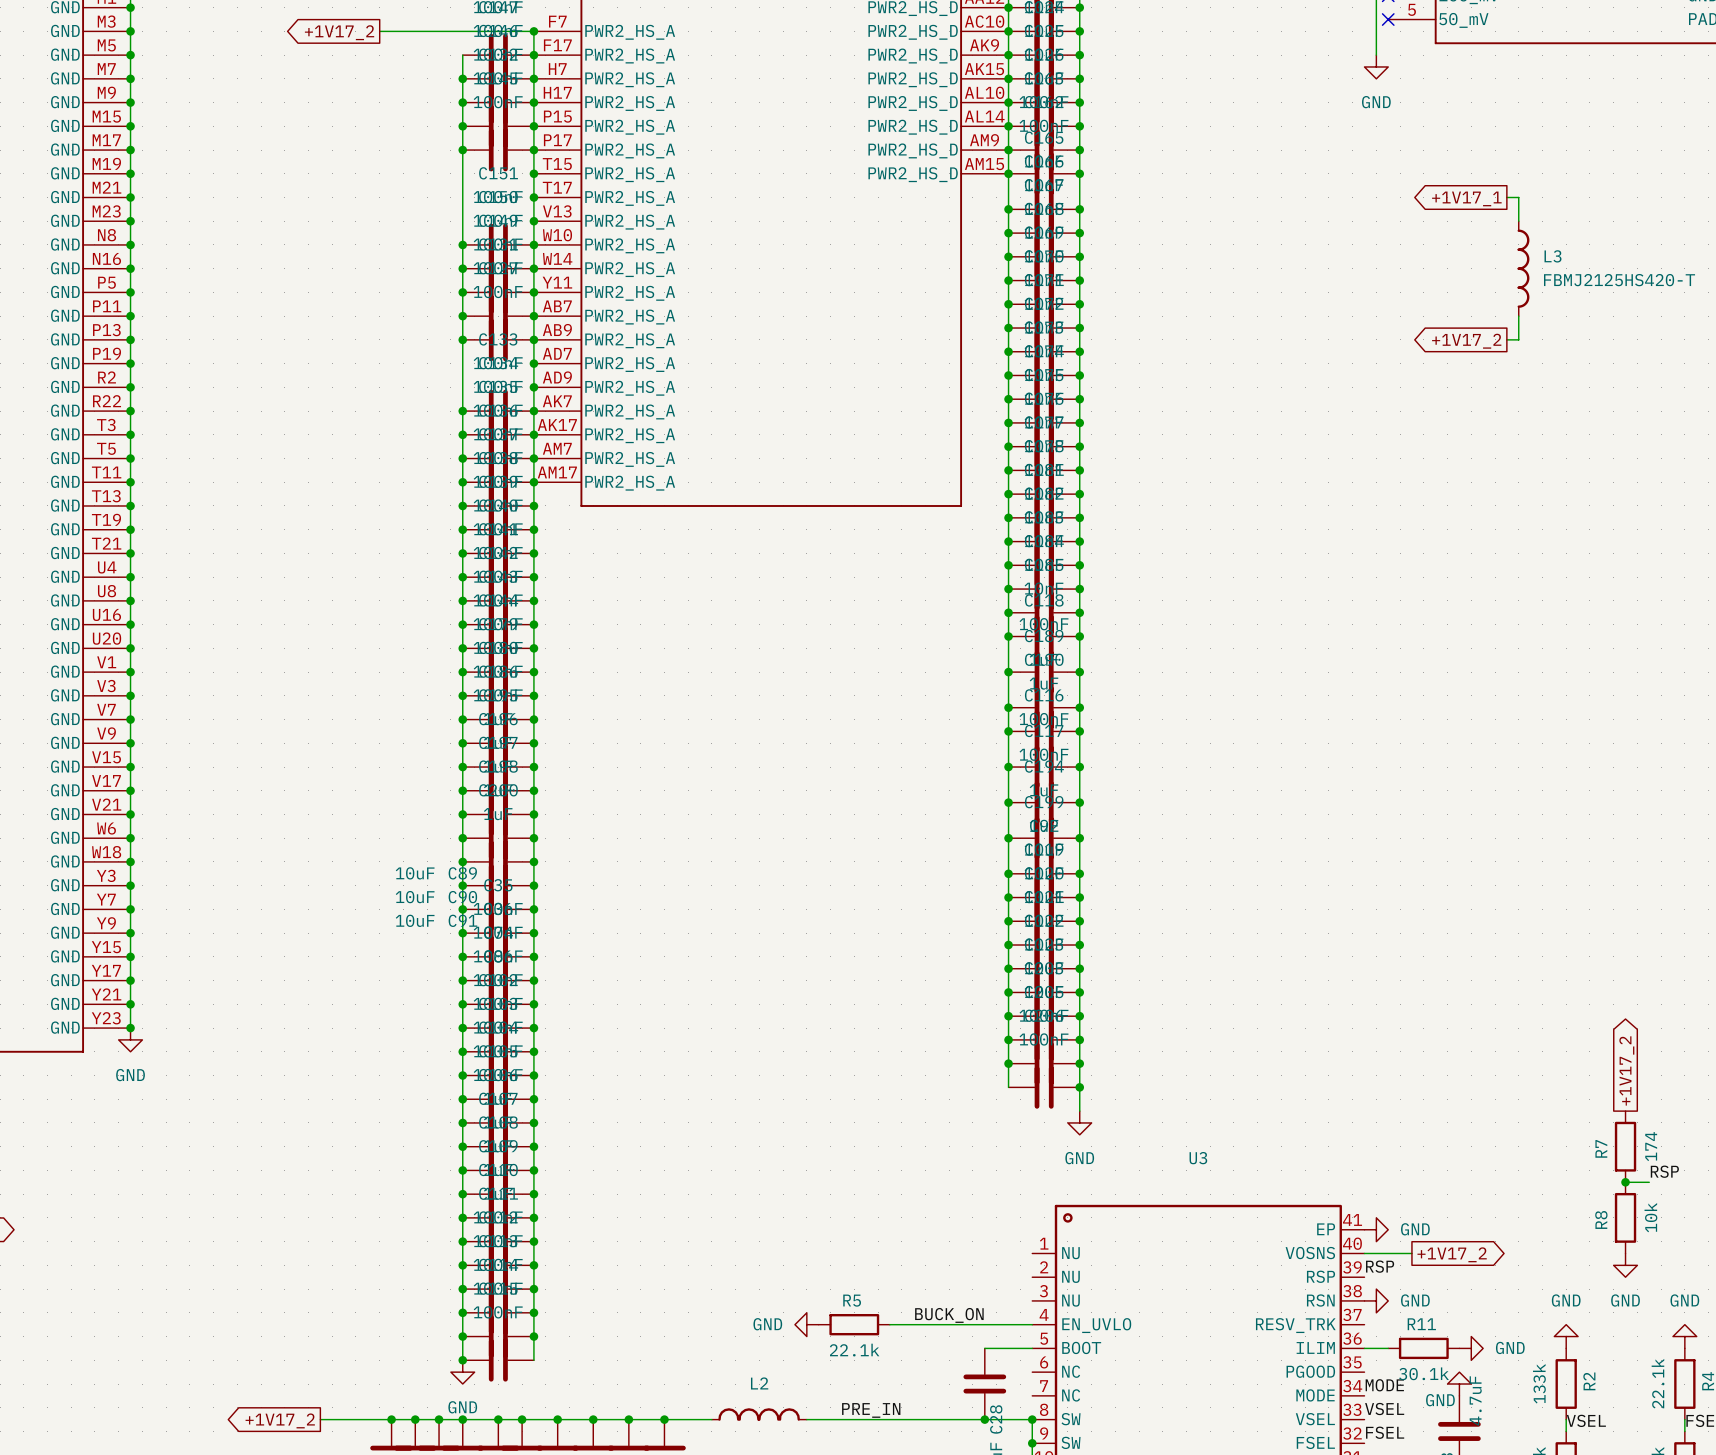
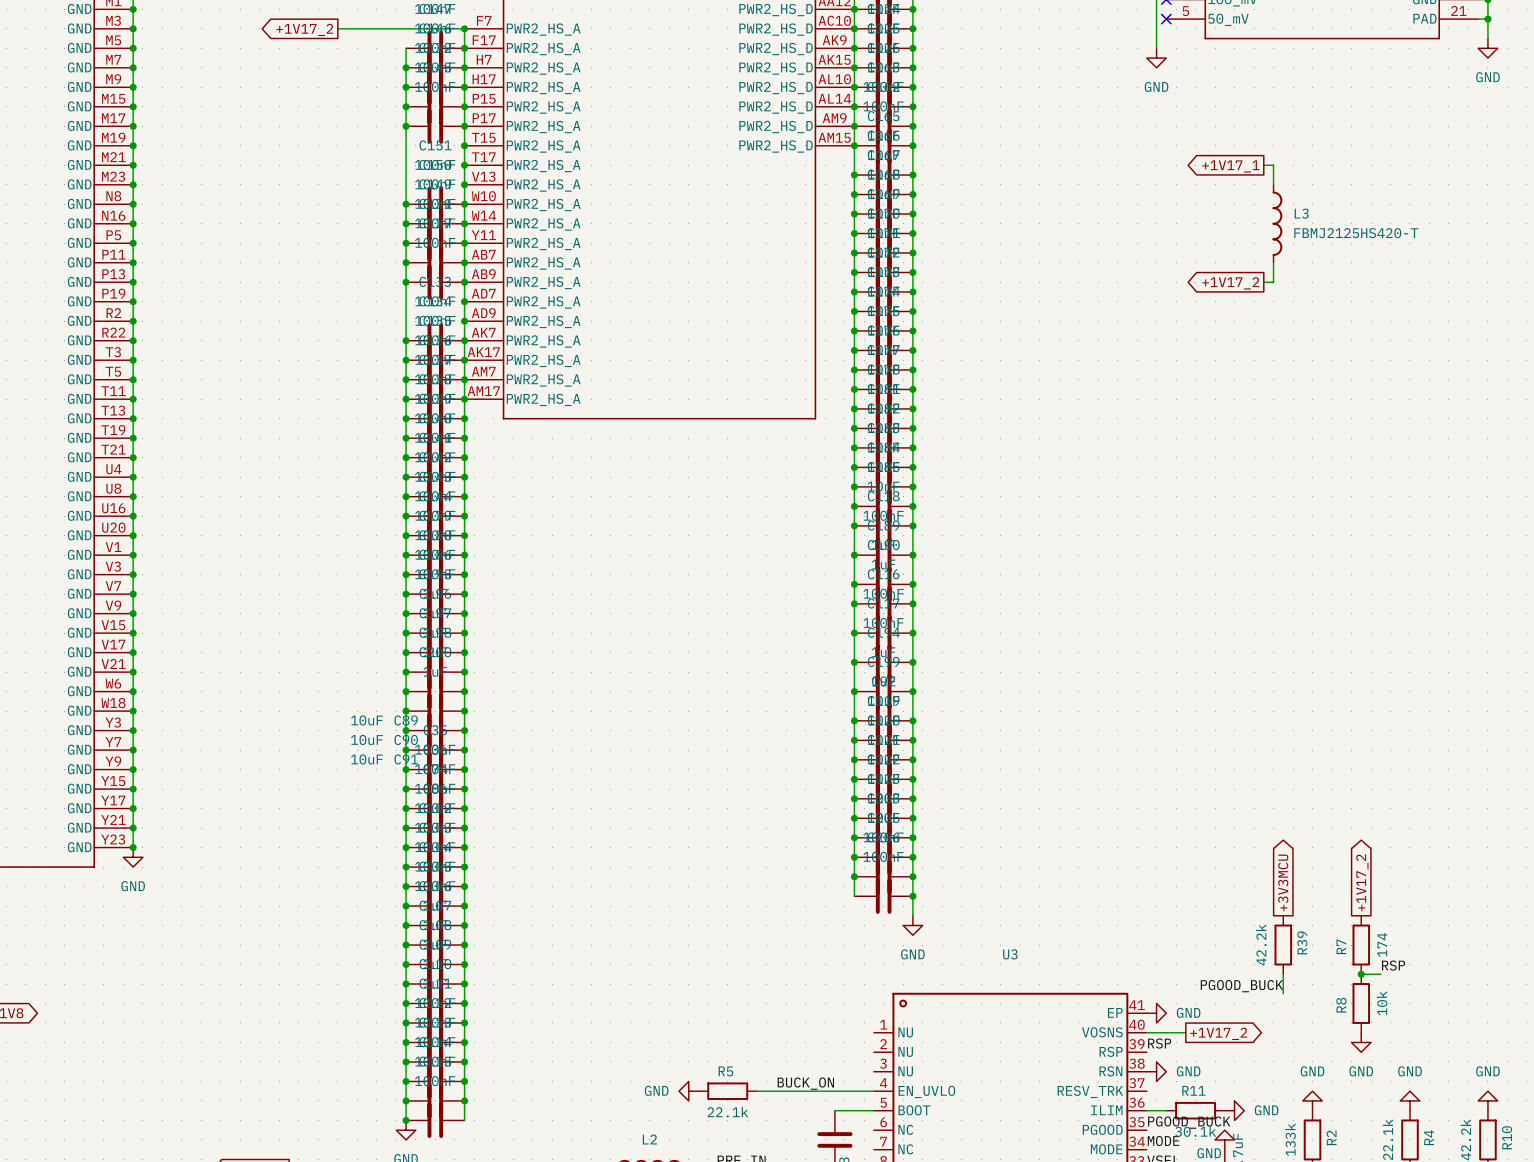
global label: none -> +3V3MCU (1283, 882)
R39: none -> 42.2k (1283, 945)
wire: none -> (1283, 974) (1283, 993)
label: none -> PGOOD_BUCK (1241, 986)
label: none -> PGOOD_BUCK (1189, 1122)

